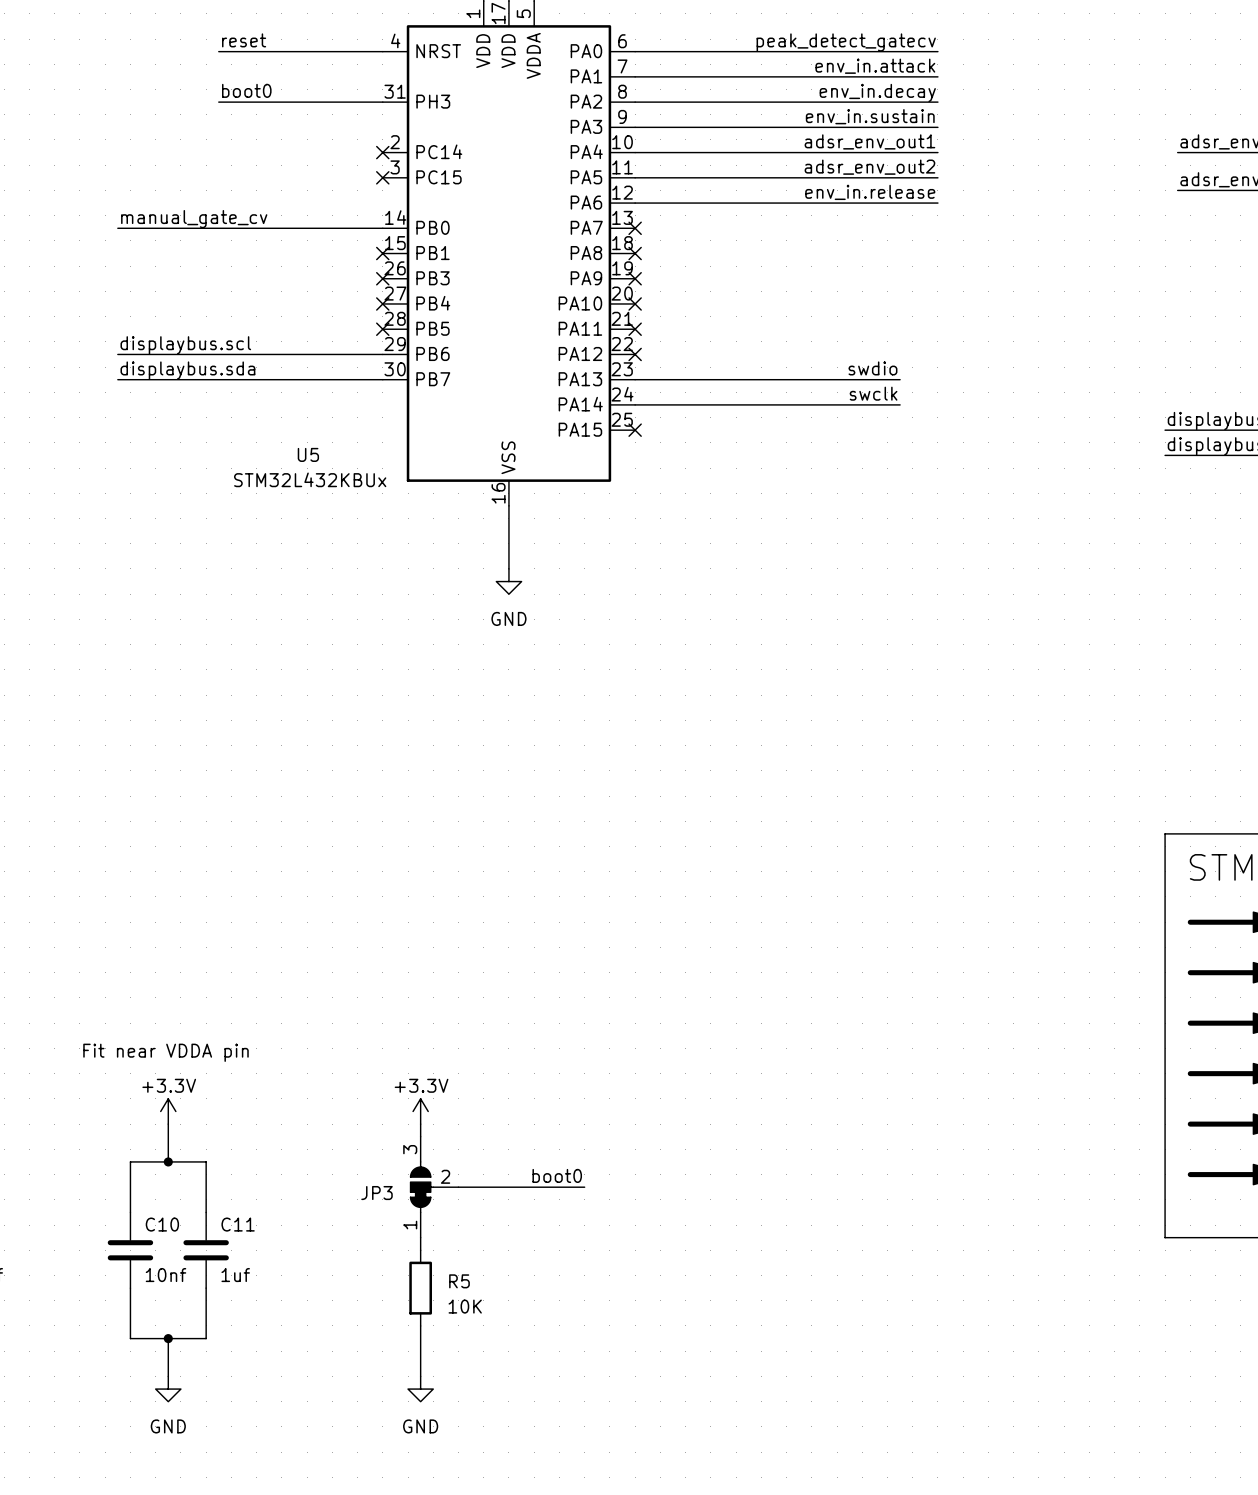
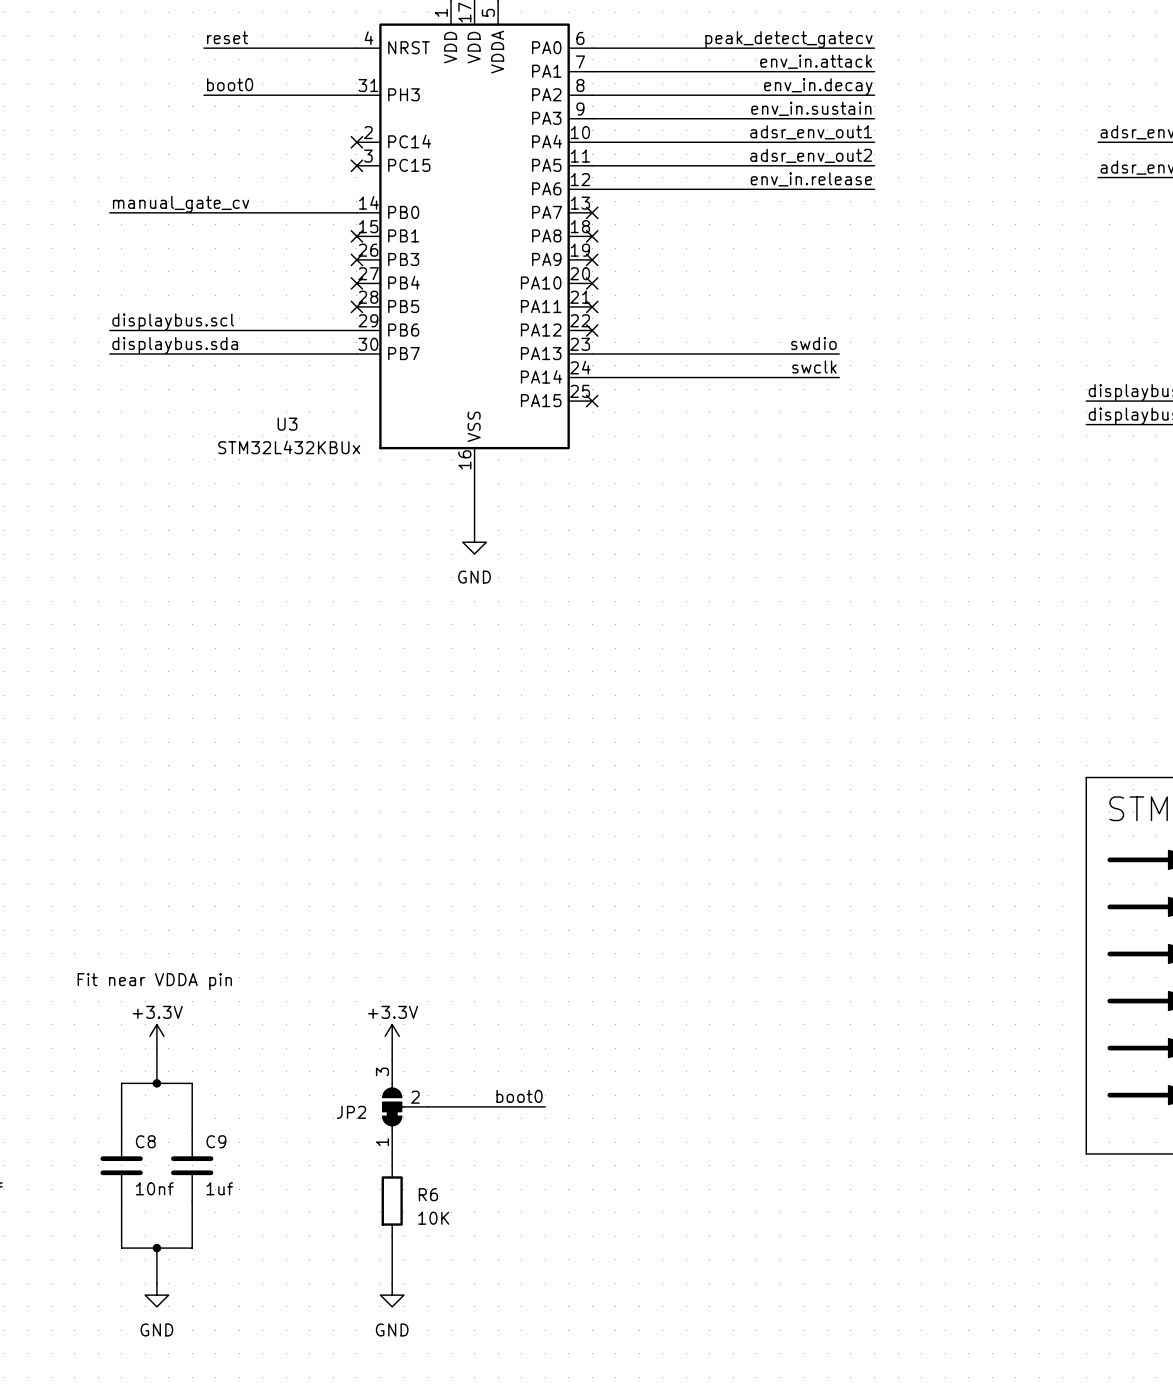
U5 name: U5 (308, 454) -> U3 (287, 424)
JP3 name: JP3 (376, 1193) -> JP2 (351, 1112)
C10 name: C10 (162, 1224) -> C8 (145, 1141)
C11 name: C11 (238, 1224) -> C9 (216, 1141)
R5 name: R5 (459, 1281) -> R6 (428, 1194)

